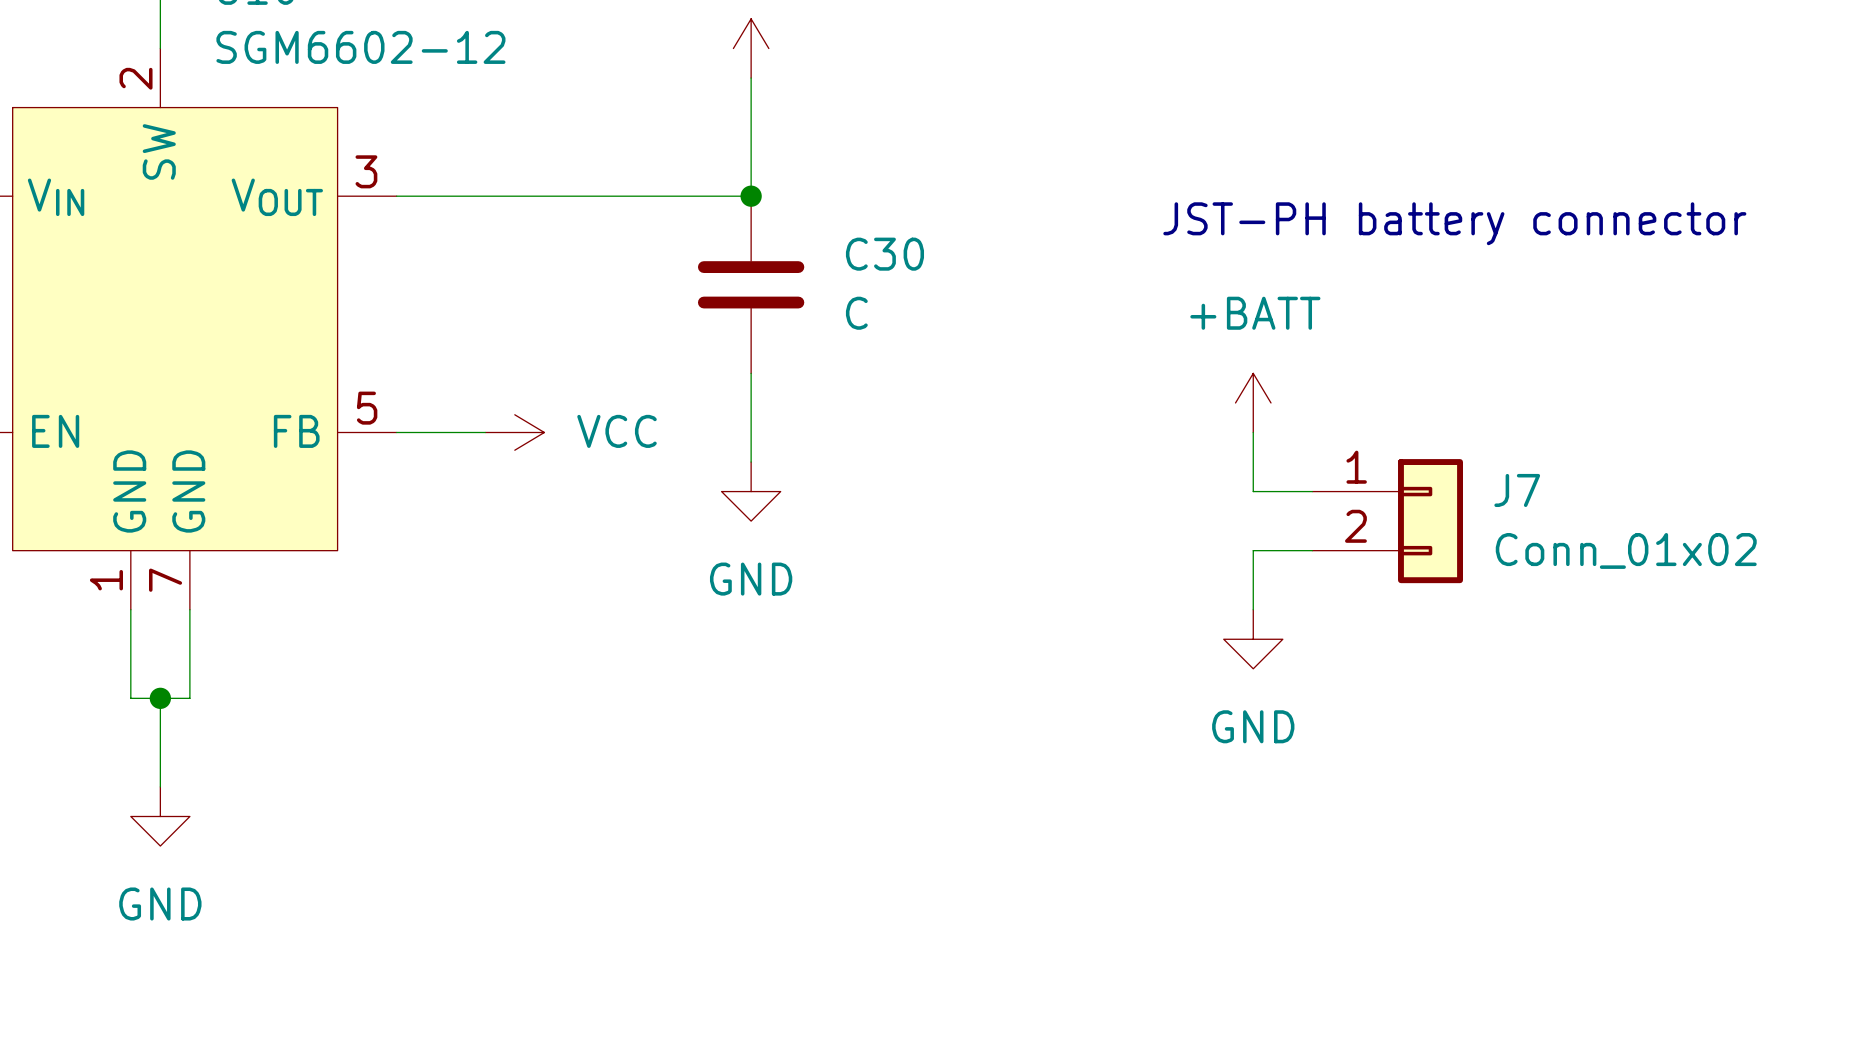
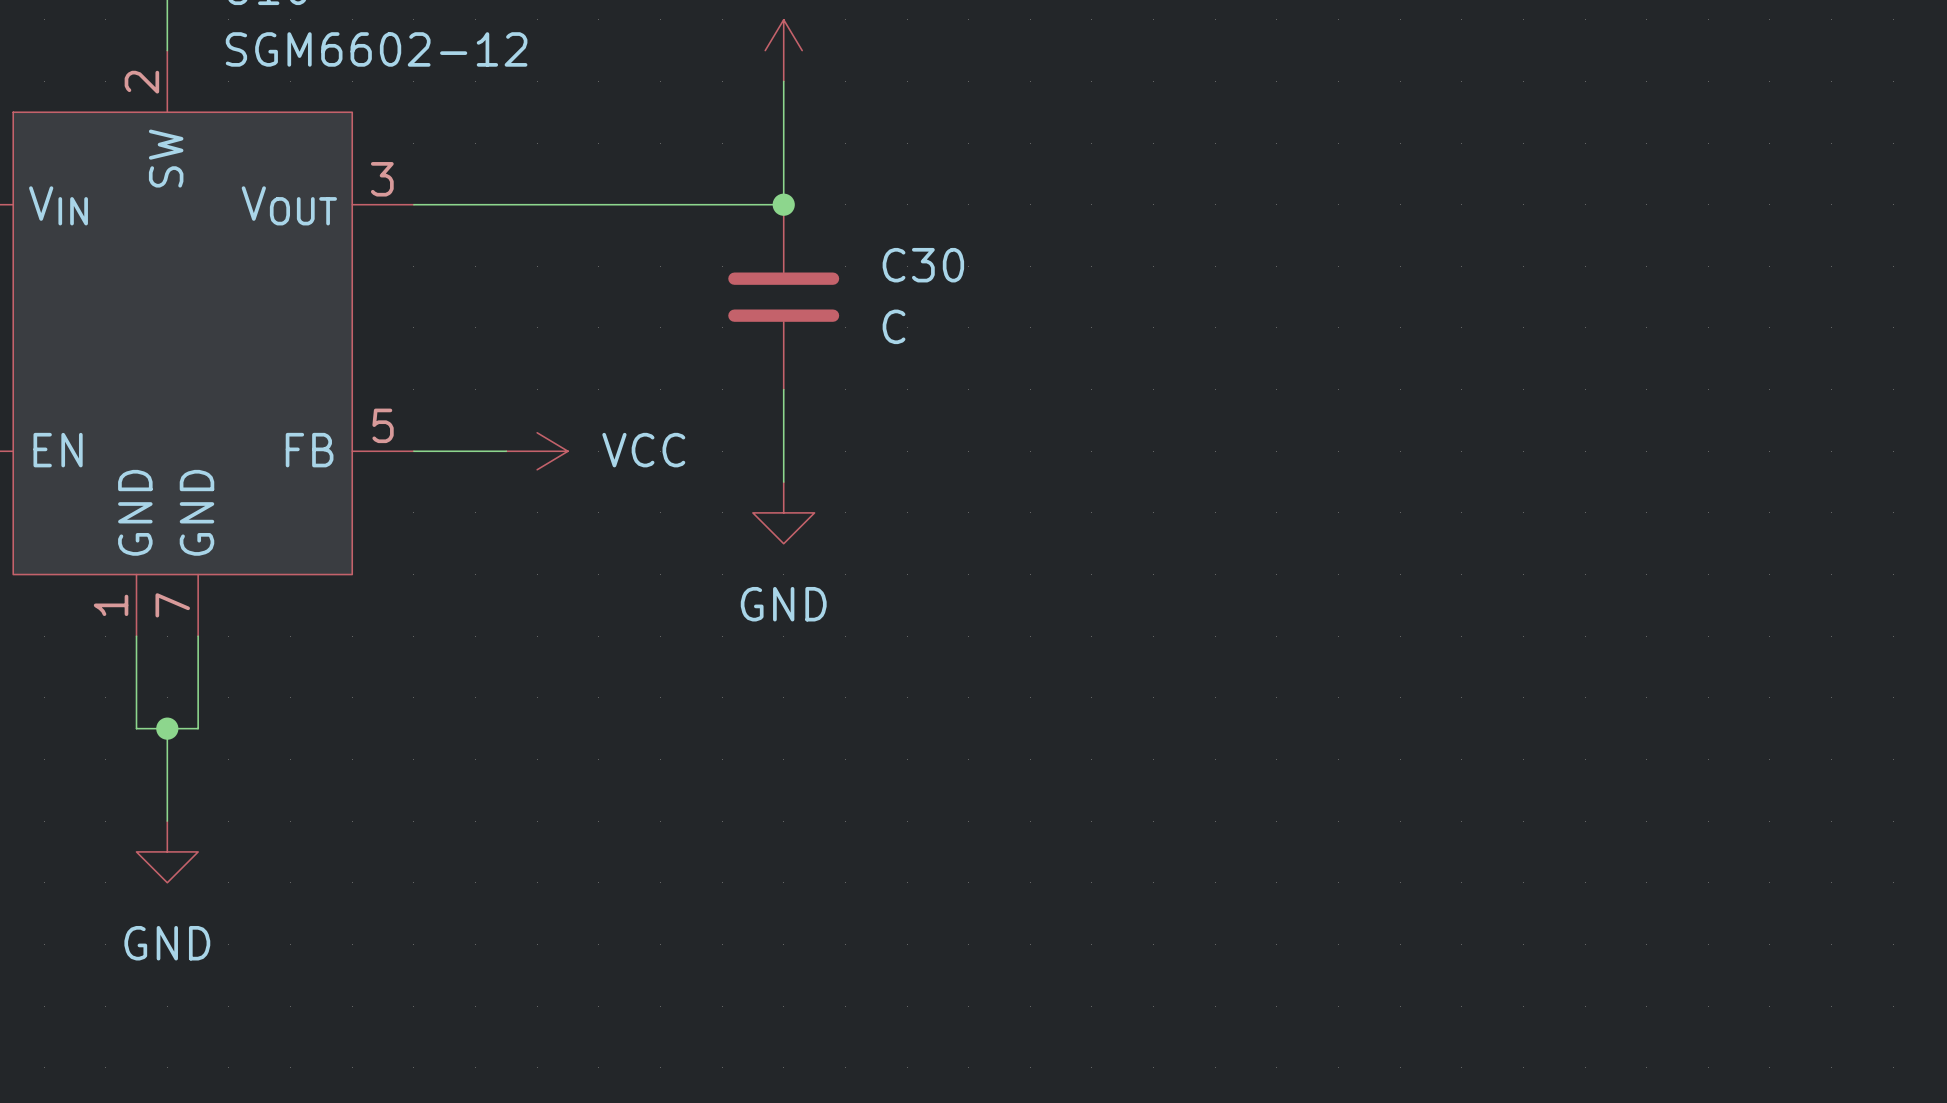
text: JST-PH battery connector (1454, 223) -> none
power symbol: +BATT (1253, 402) -> none
wire: (1253, 432) (1253, 491) (1312, 491) -> none
J7: Conn_01x02 (1387, 521) -> none
wire: (1312, 550) (1253, 550) (1253, 609) -> none
power symbol: GND (1253, 639) -> none

